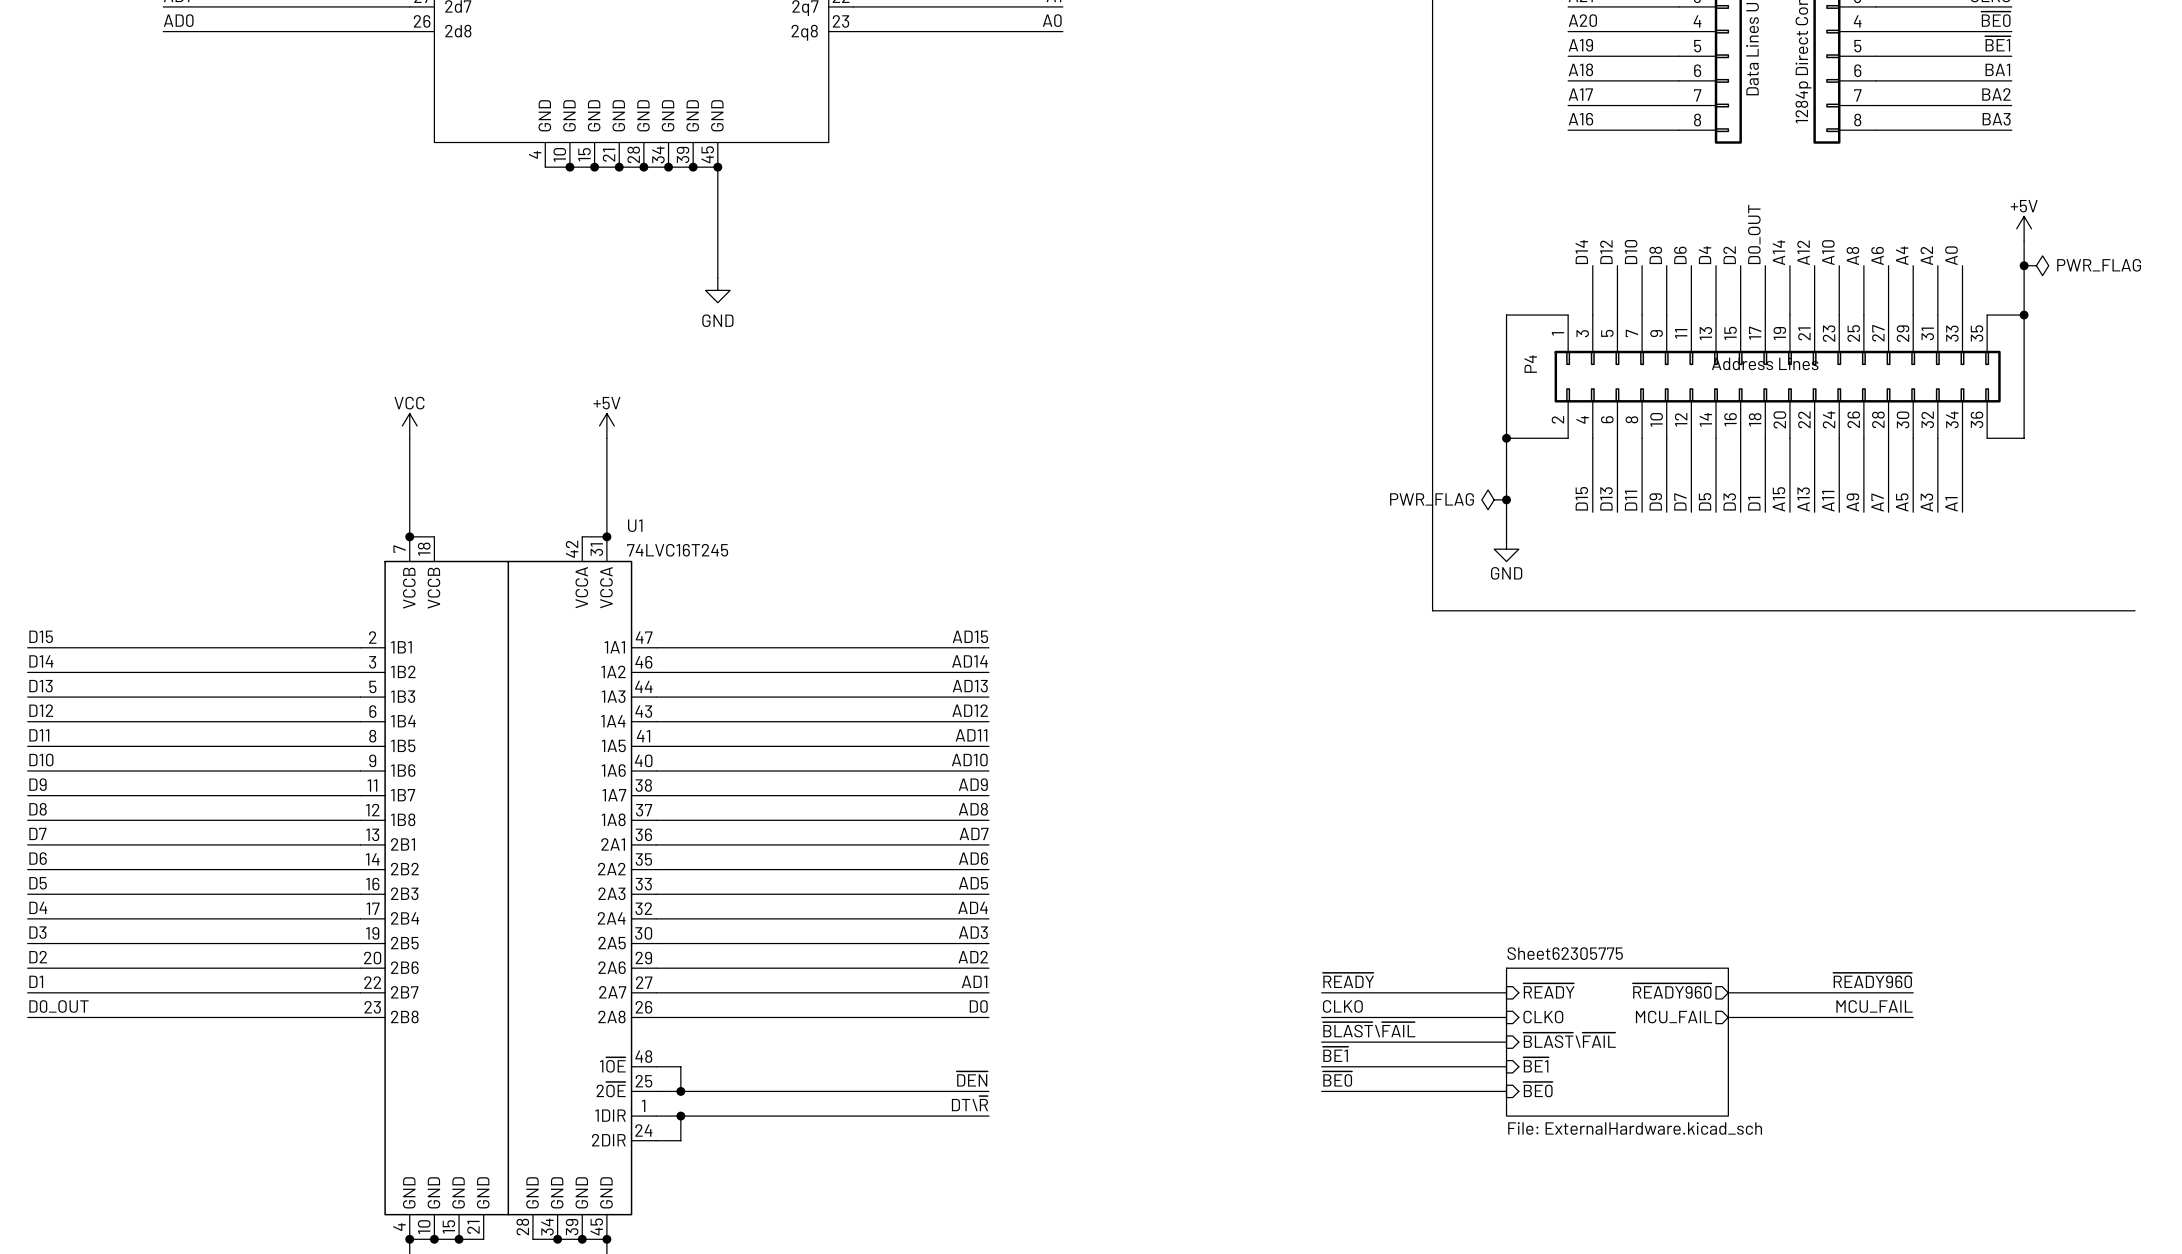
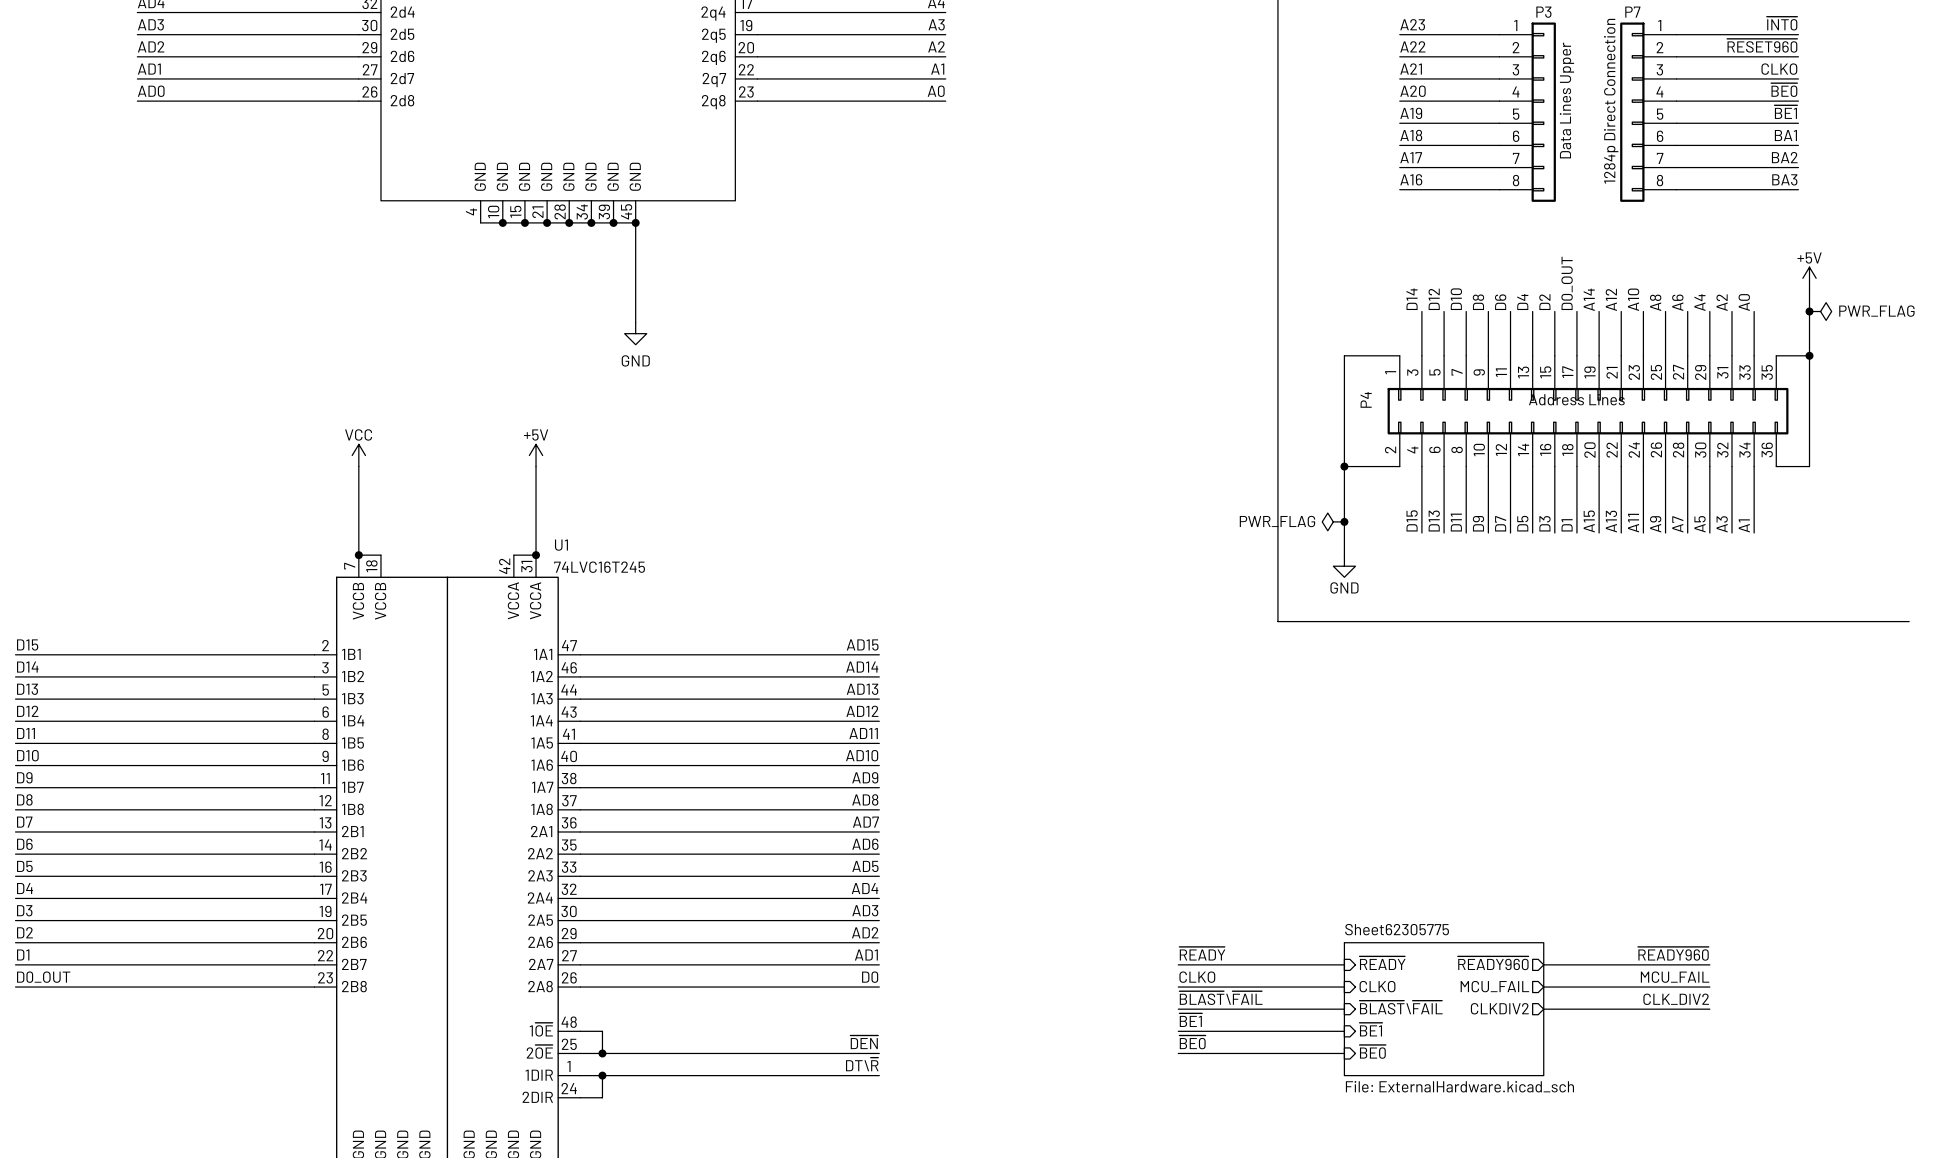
label: none -> CLK_DIV2 (1676, 999)
sheet pin: none -> CLKDIV2 (1499, 1008)
wire: none -> (1543, 1009) (1709, 1009)

